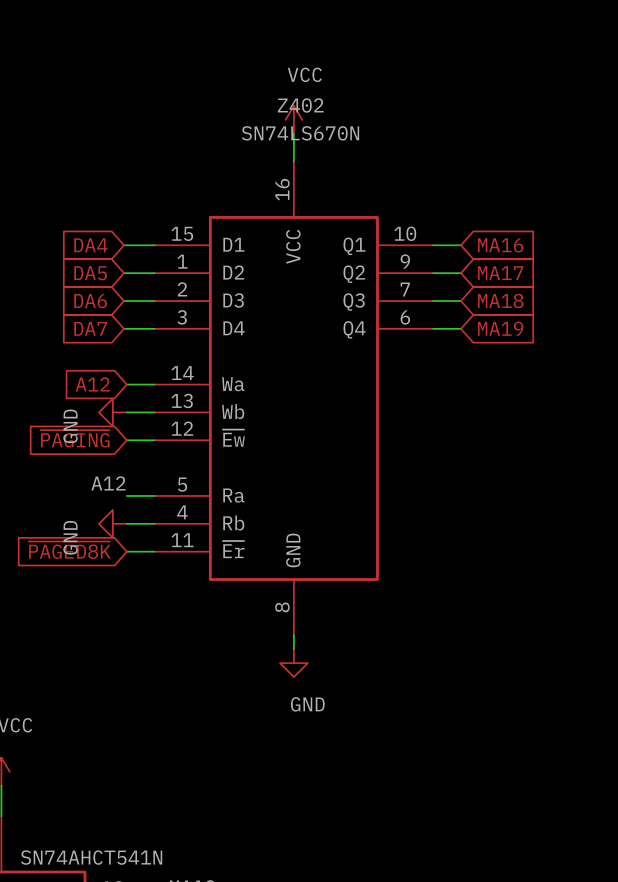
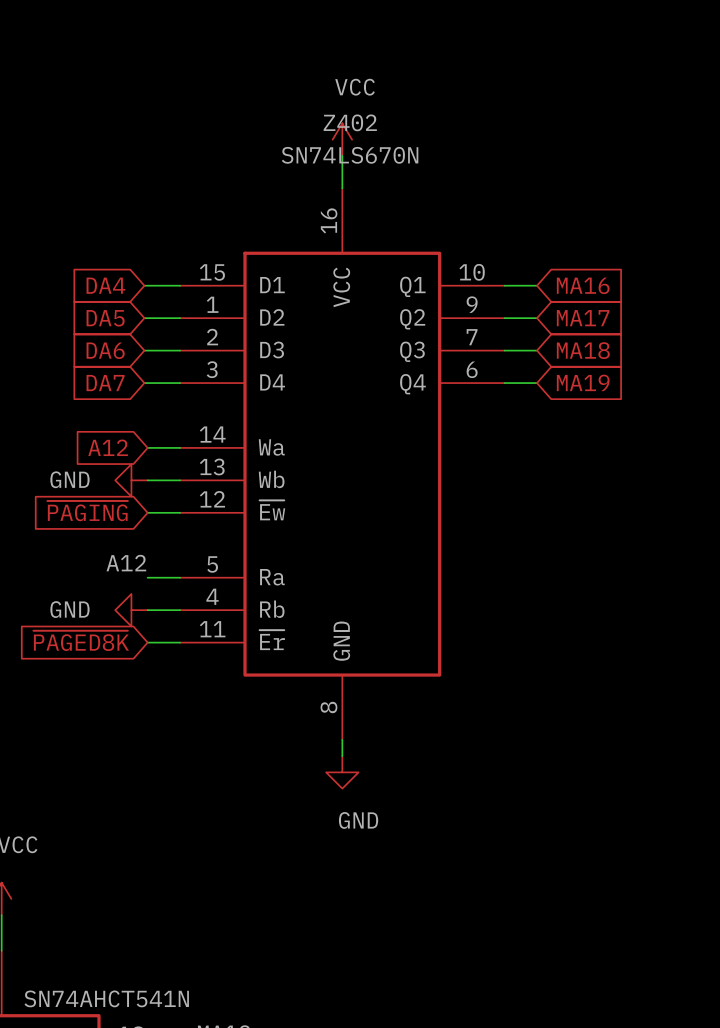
power symbol text rotation: 0° (70, 426) -> 90° clockwise (69, 479)
power symbol text rotation: 0° (70, 537) -> 90° clockwise (69, 609)

